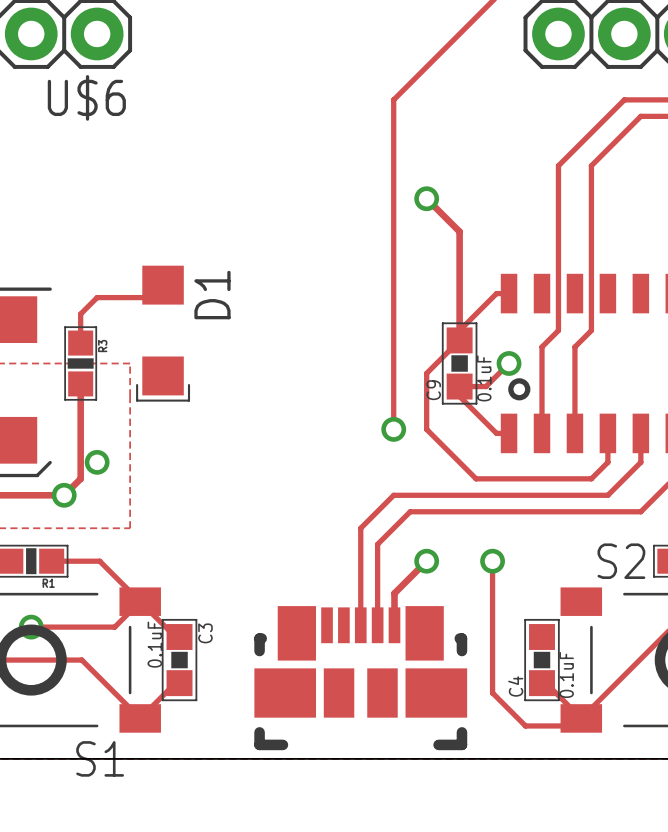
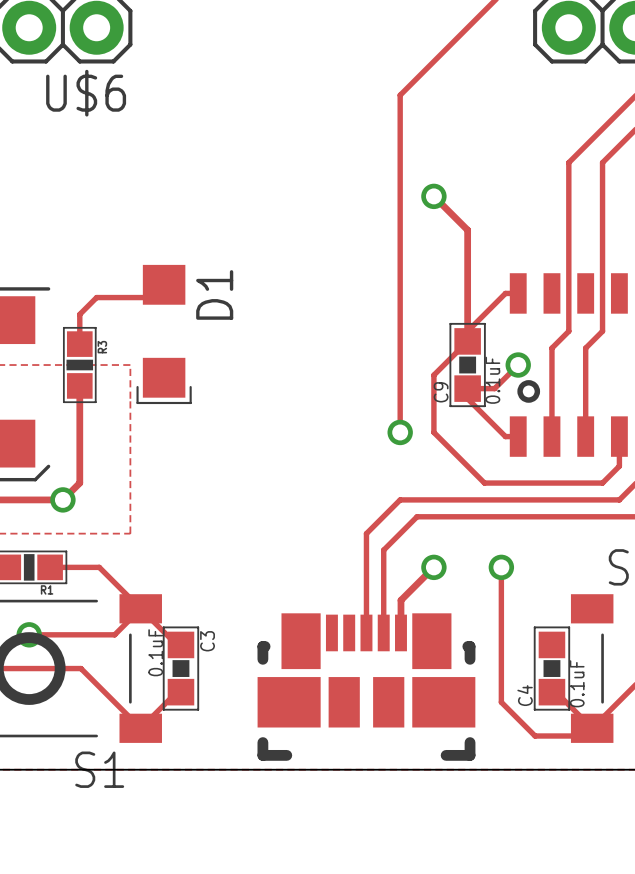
via: (97, 462) -> none

